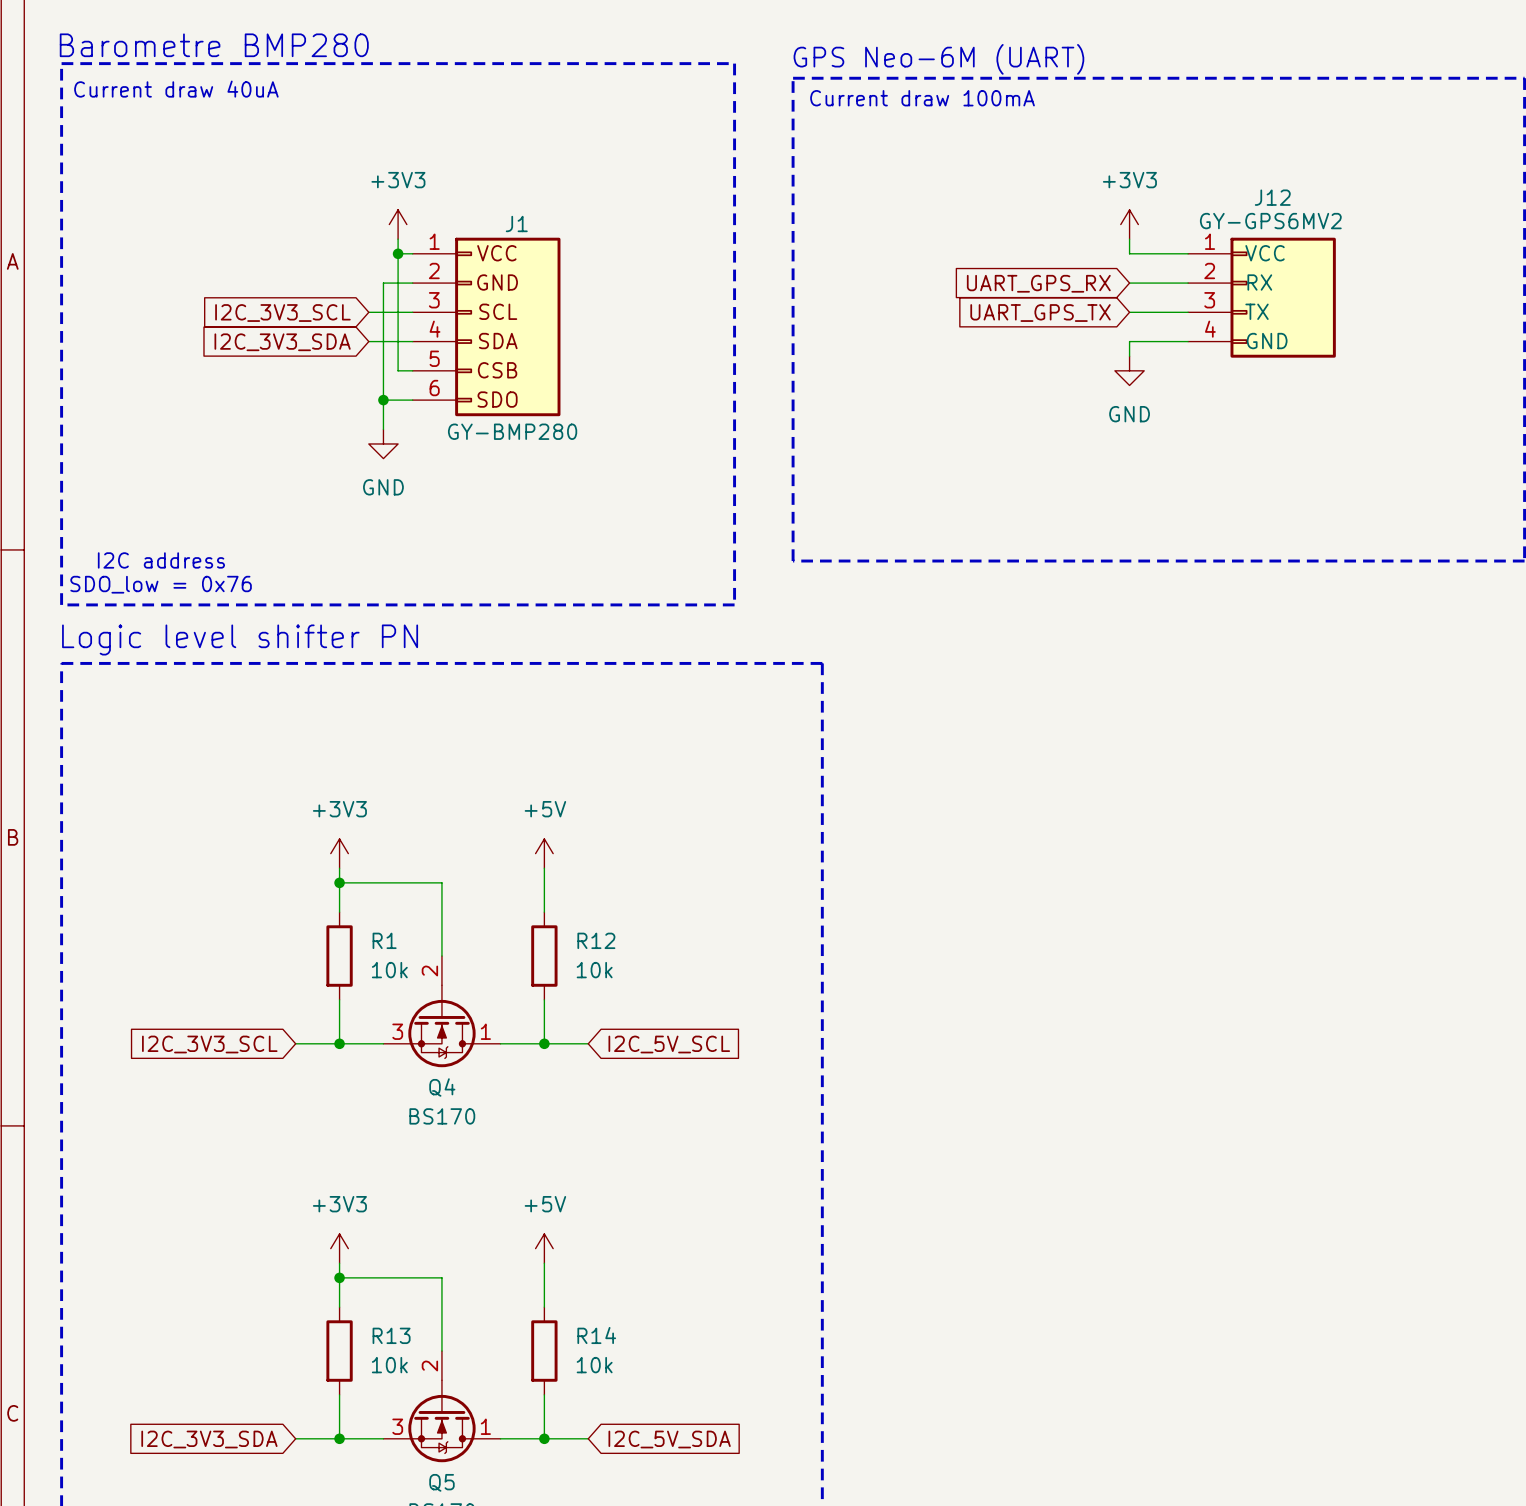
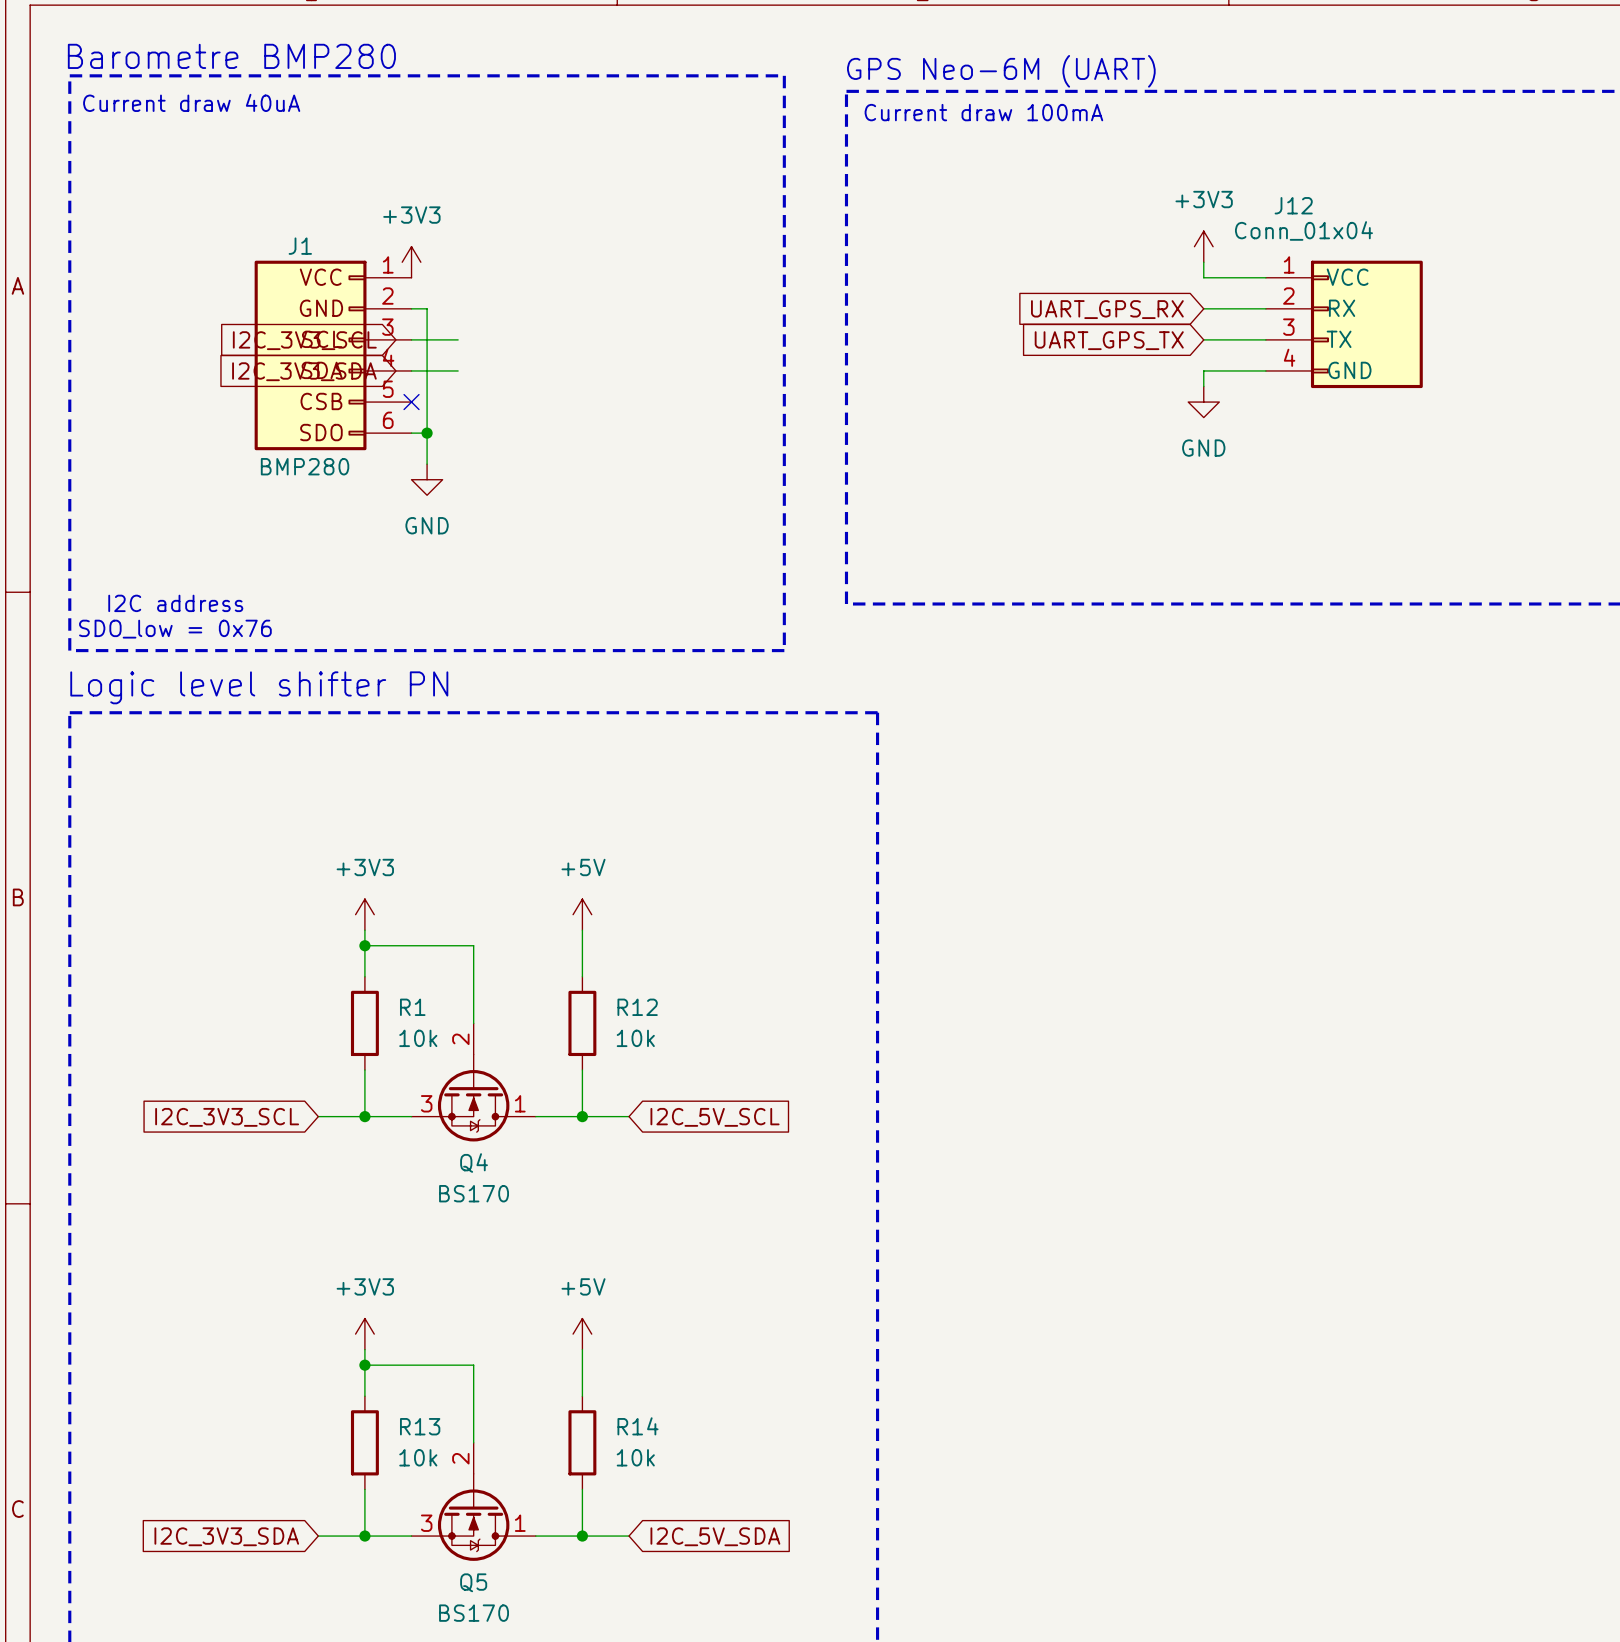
J12 name position: J12 (1272, 197) -> J12 (1293, 205)
J12 value: GY-GPS6MV2 (1270, 221) -> Conn_01x04 (1303, 230)
power symbol position: +3V3 (398, 224) -> +3V3 (411, 262)
wire: (398, 239) (398, 283) (412, 283) -> none
wire: (398, 253) (412, 253) -> none
junction: (398, 253) -> none
wire: (383, 283) (383, 429) -> none
J1 position: (486, 326) -> (333, 355)
J1 flip: as is (507, 326) -> left-right (310, 355)
no-connect mark: none -> (411, 402)
wire: (398, 370) (412, 370) -> (427, 402) (427, 464)
junction position: (383, 400) -> (427, 433)
wire: (398, 400) (412, 400) -> none
J1 value: GY-BMP280 (512, 431) -> BMP280 (305, 466)
power symbol position: GND (383, 443) -> GND (427, 479)

